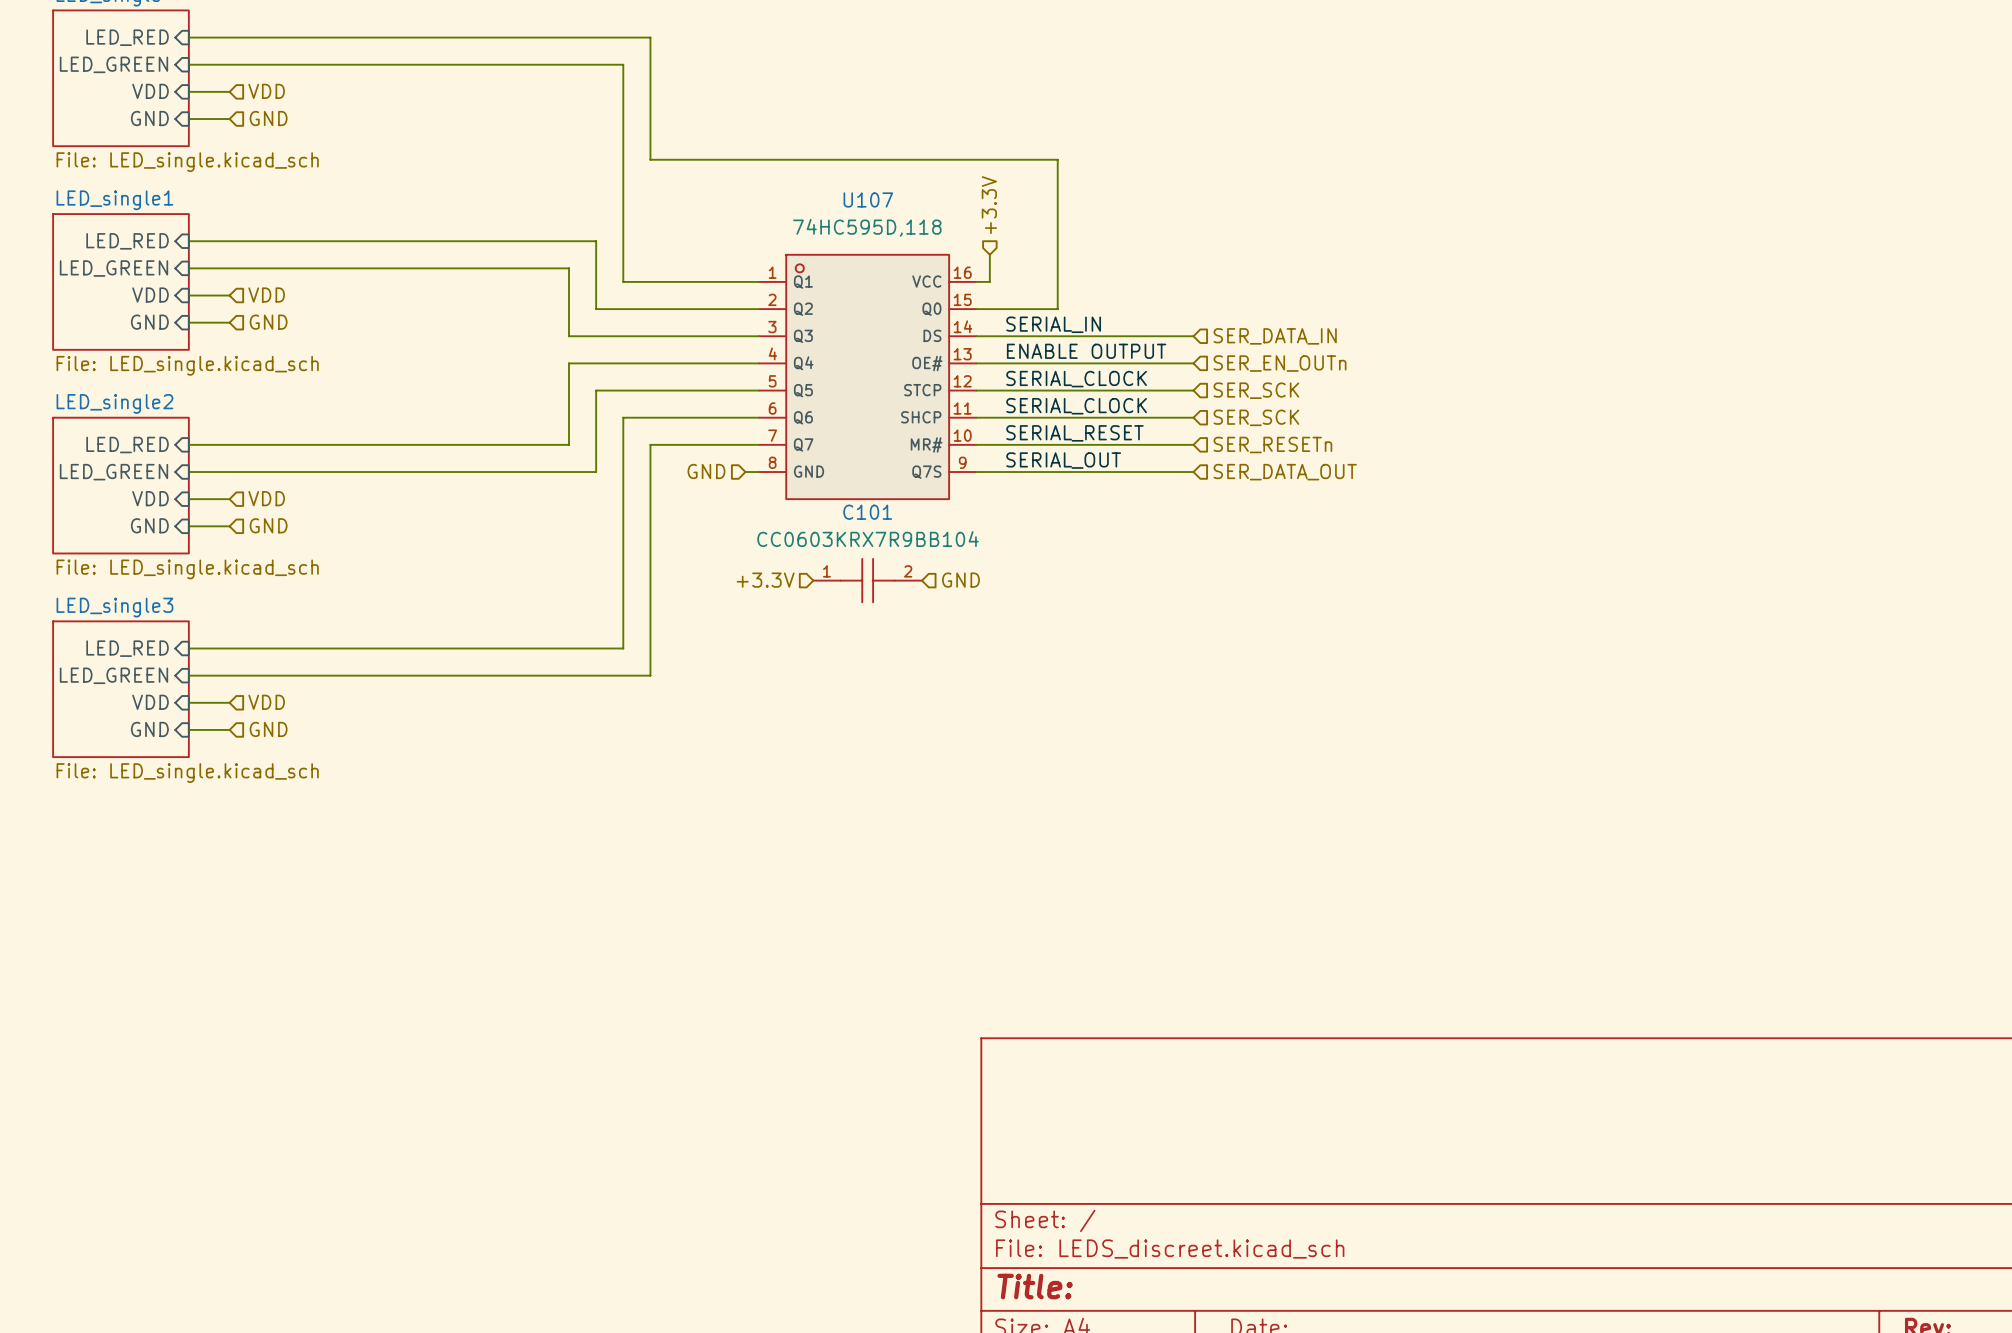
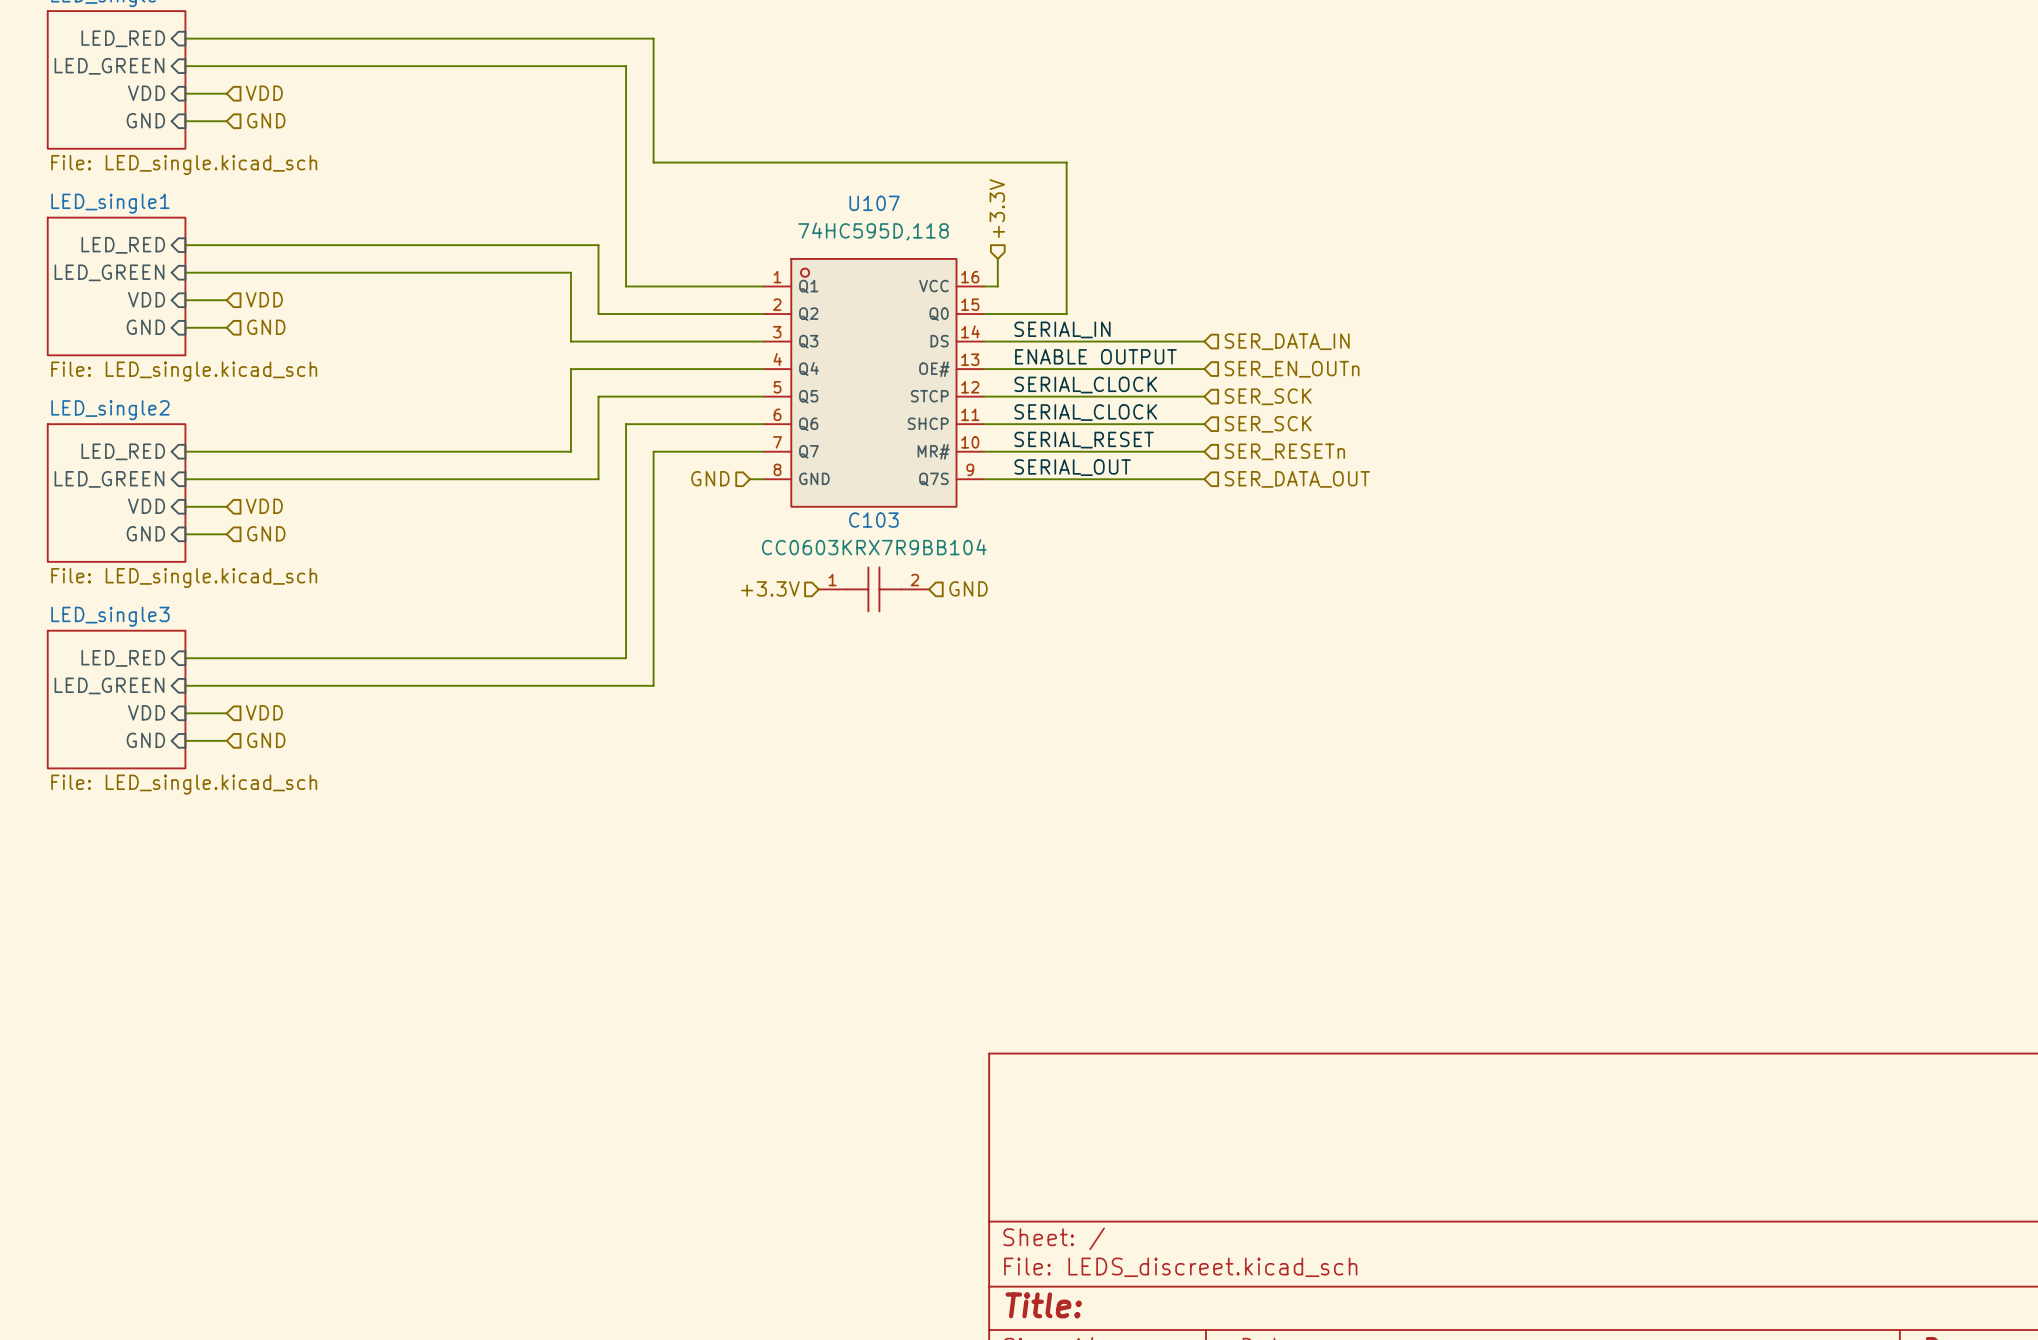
C101 name: C101 (867, 512) -> C103 (873, 520)

